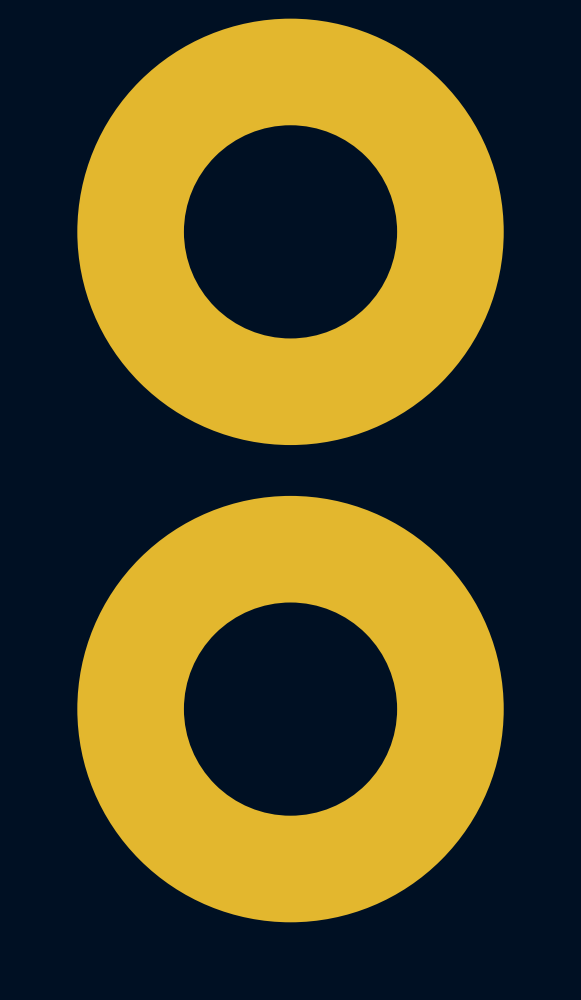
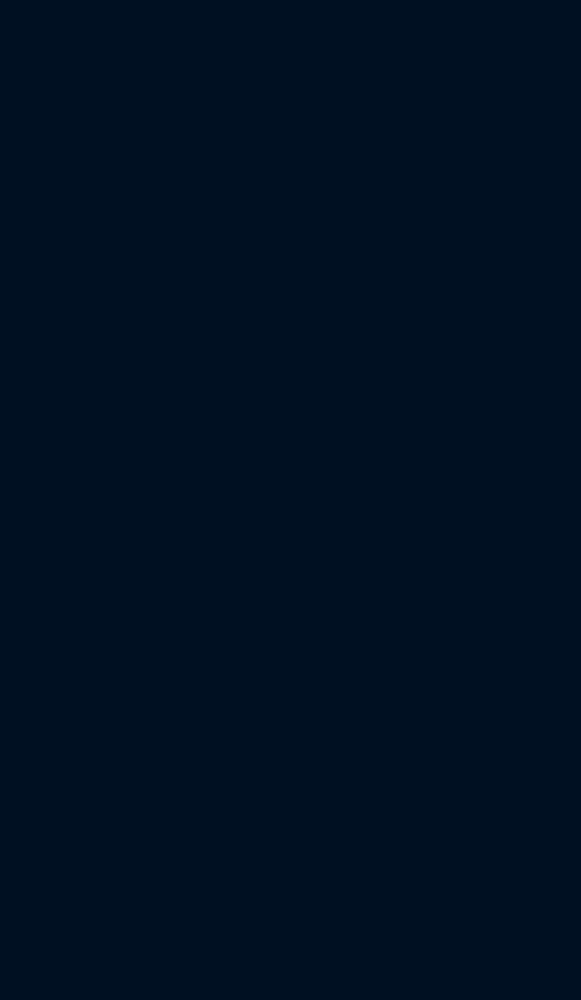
part: (290, 231) -> none
part: (290, 709) -> none

